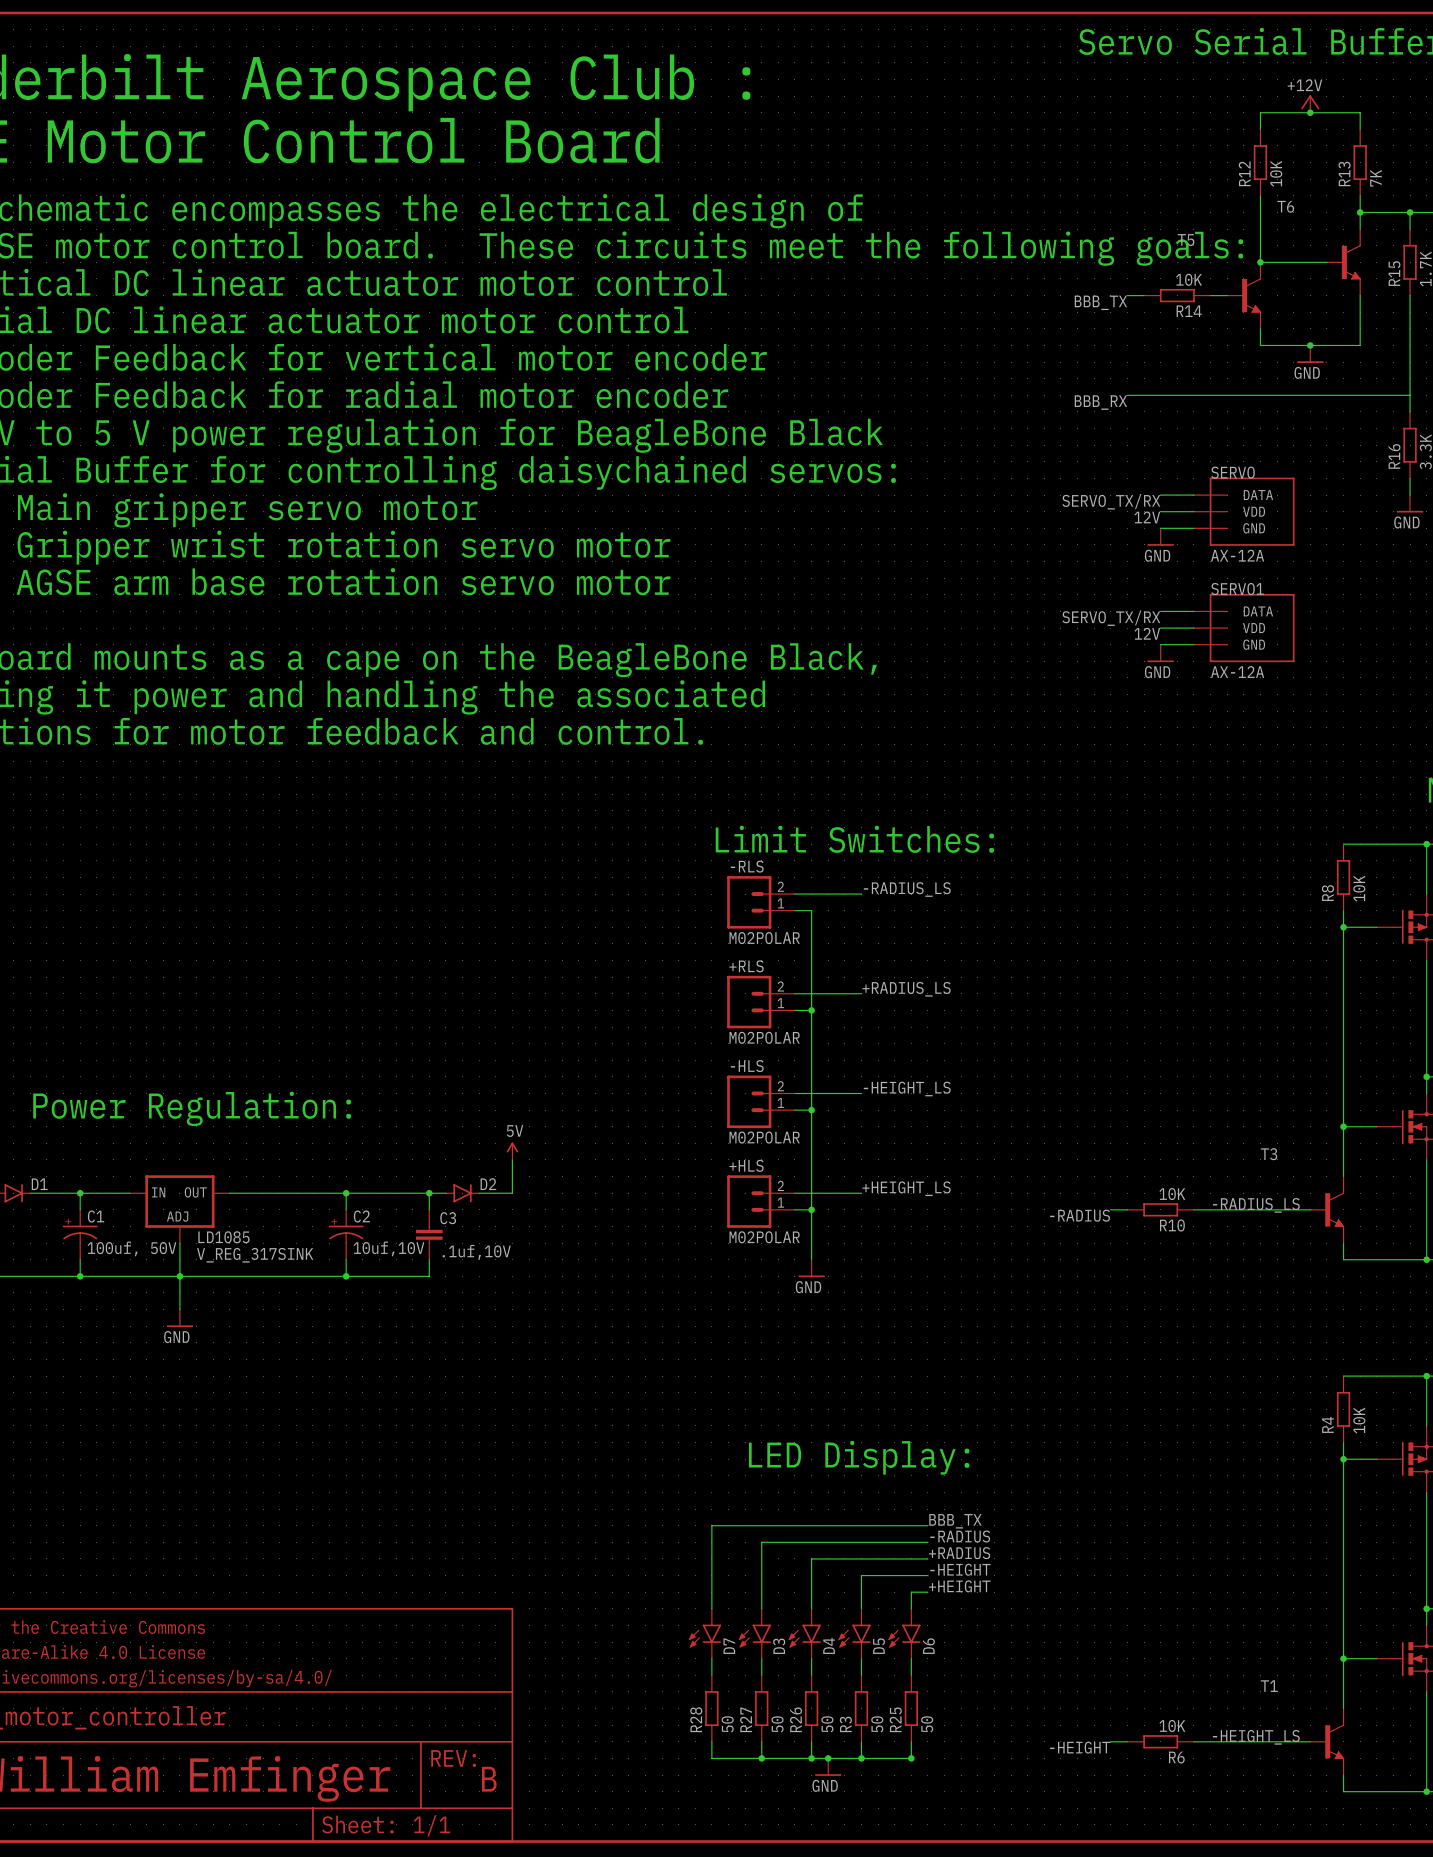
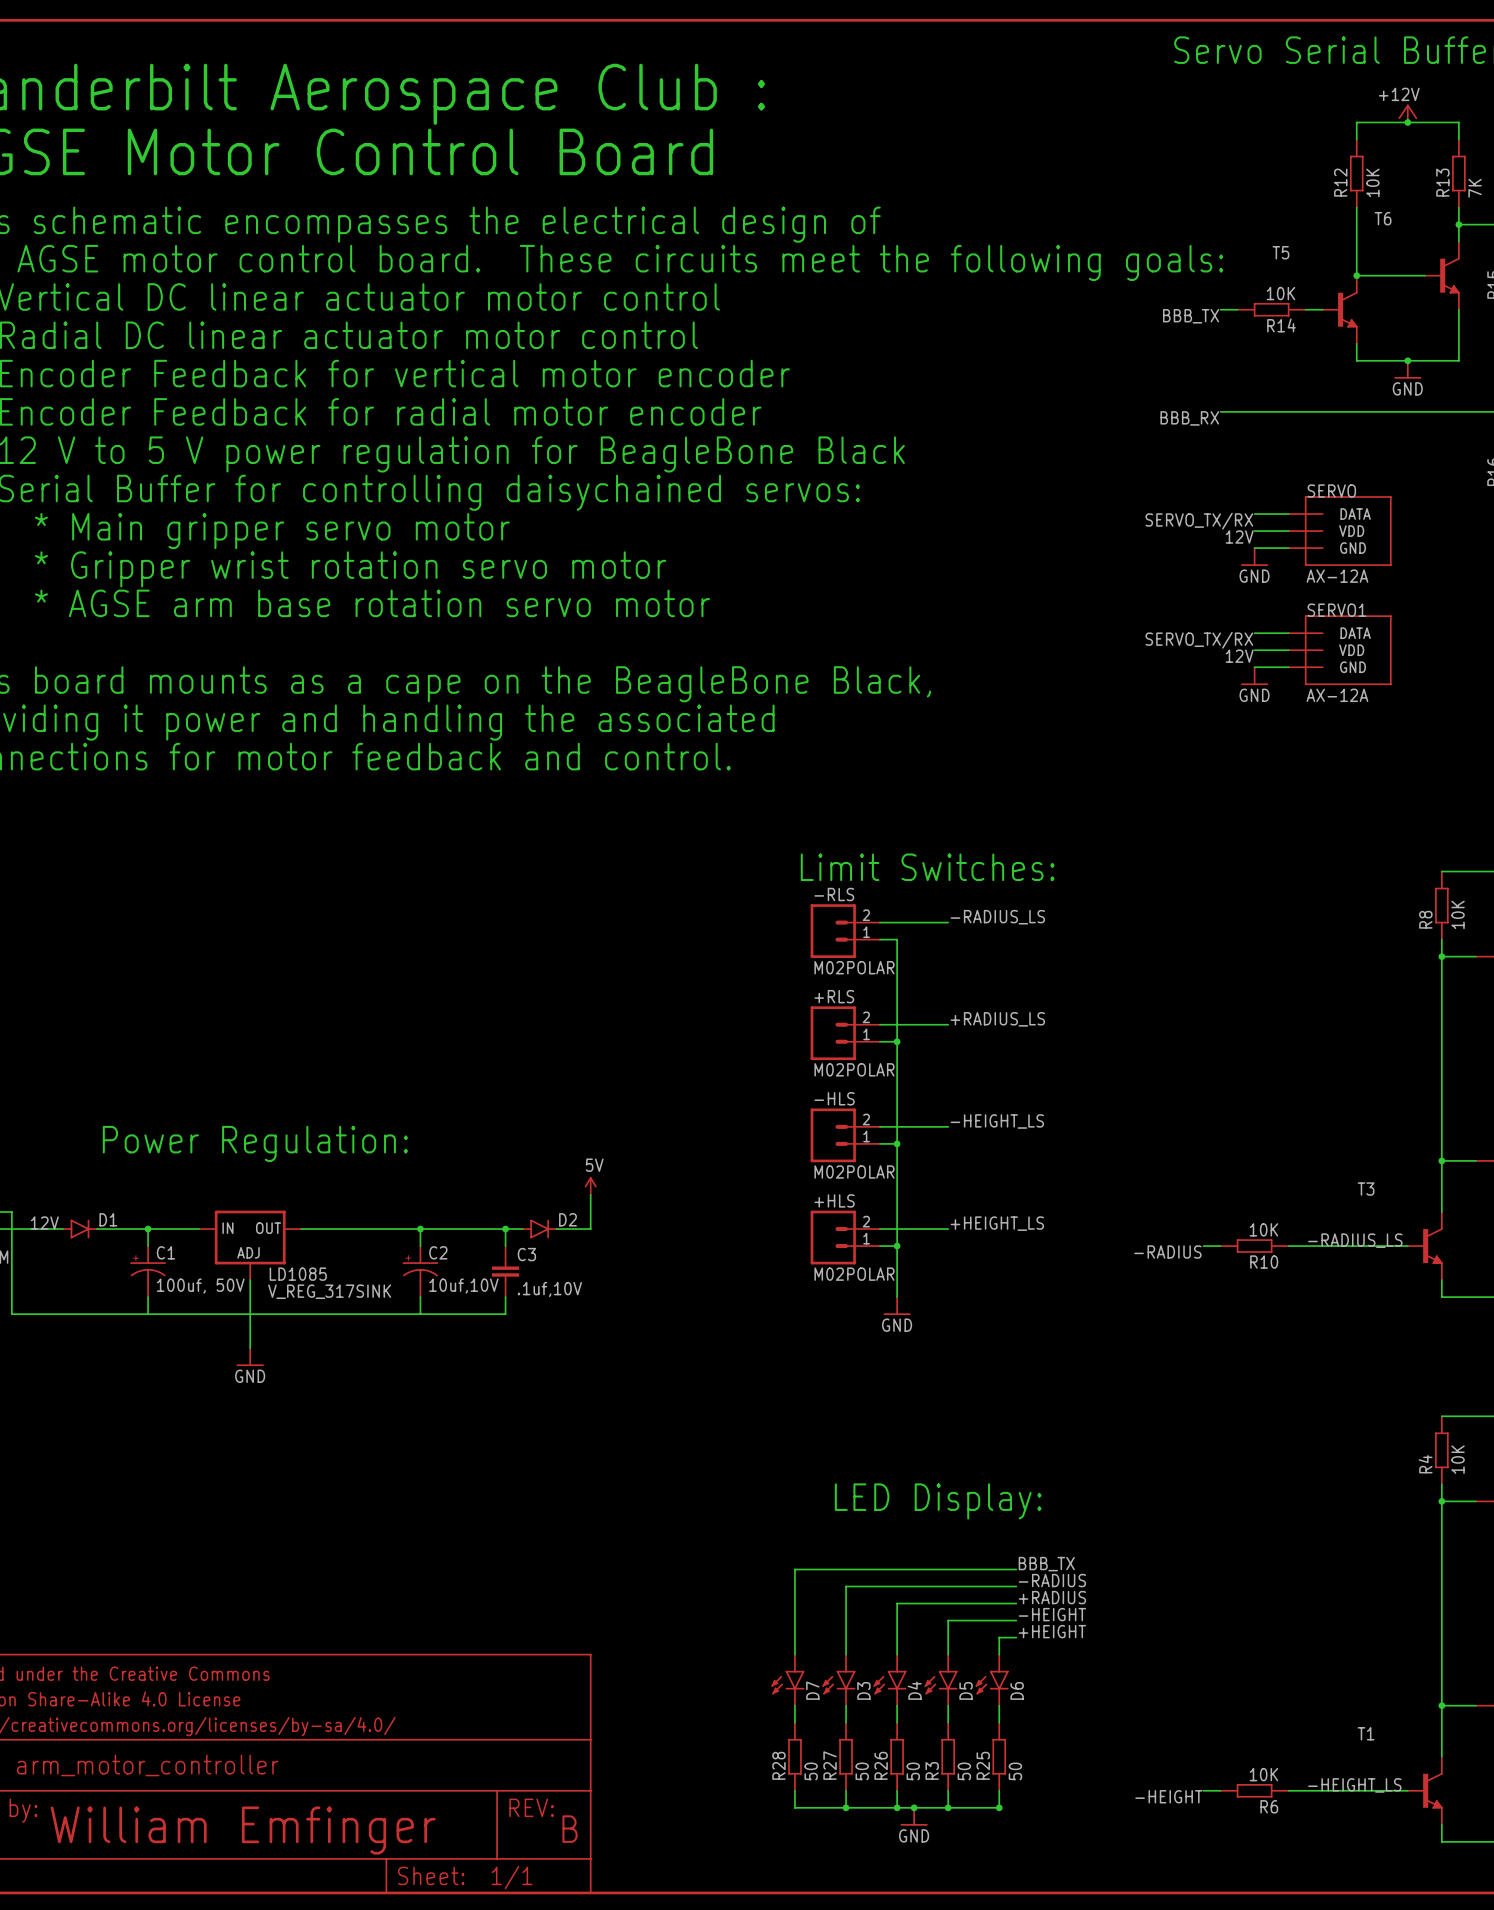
junction: (80, 1276) -> none
junction: (179, 1276) -> none
junction: (346, 1276) -> none

